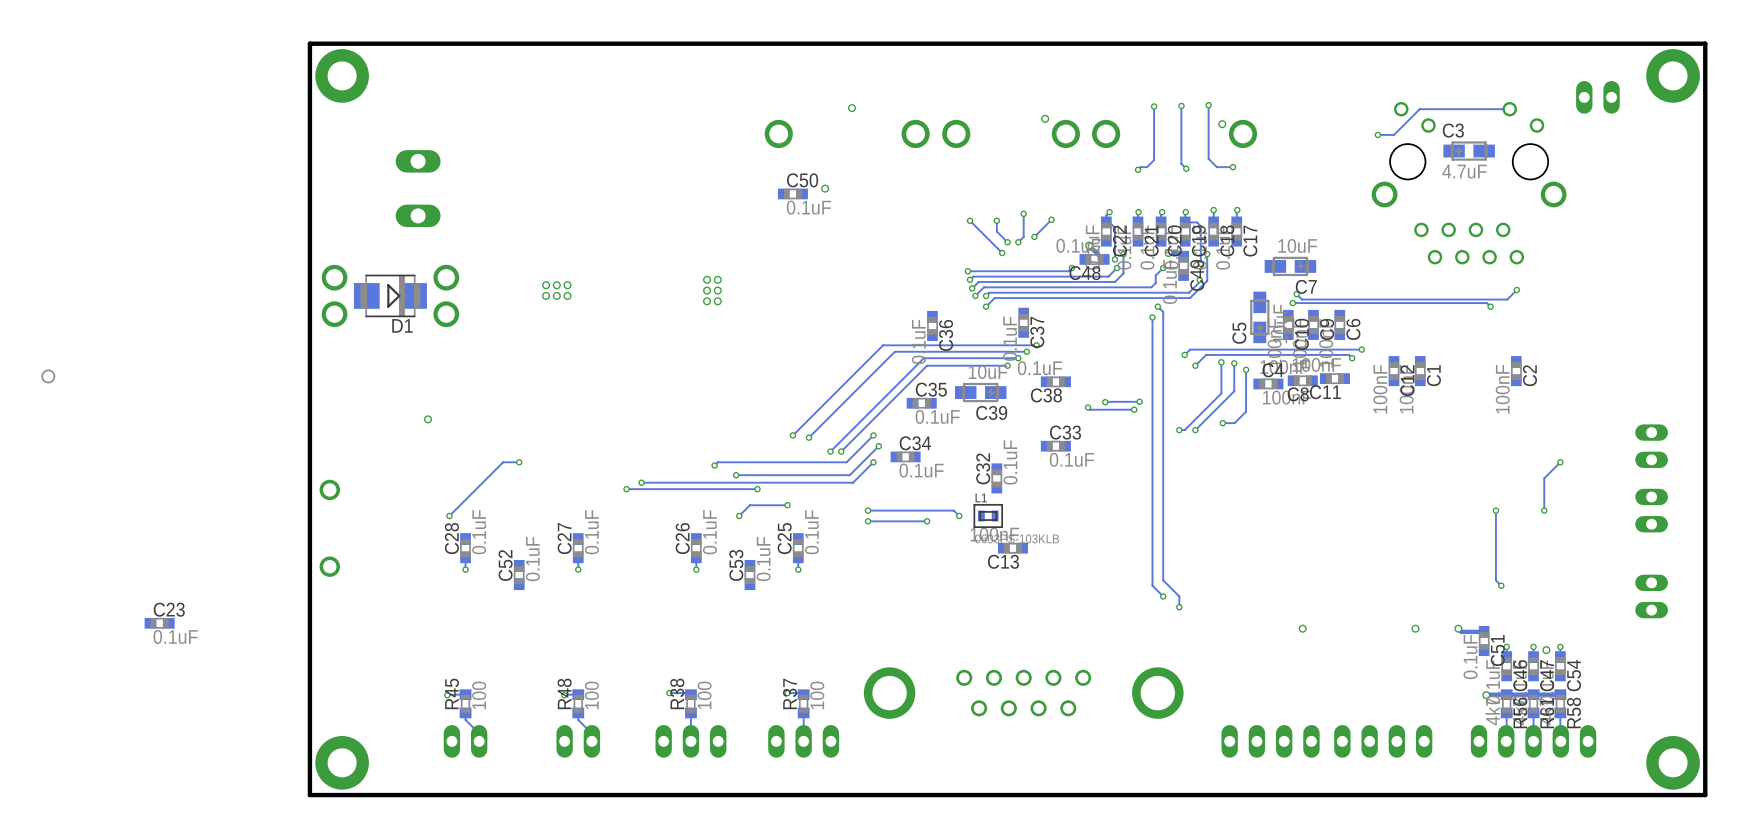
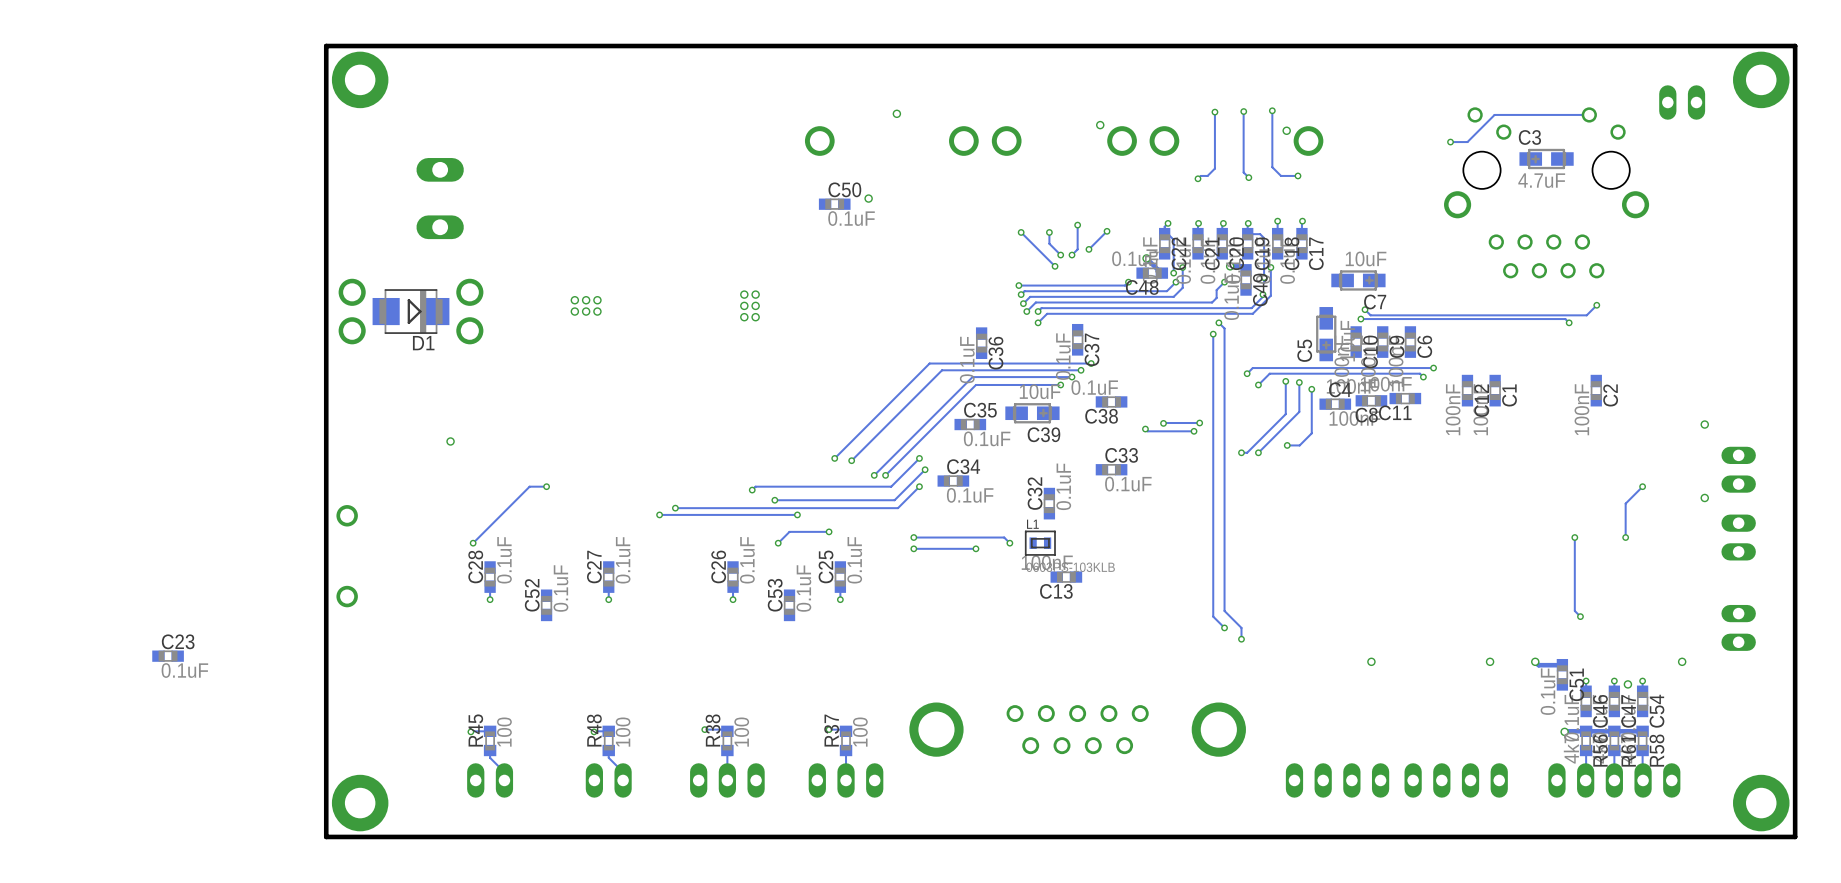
part: (48, 376) -> none
via: none -> (1704, 424)
via: none -> (1704, 497)
via: none -> (1682, 661)

